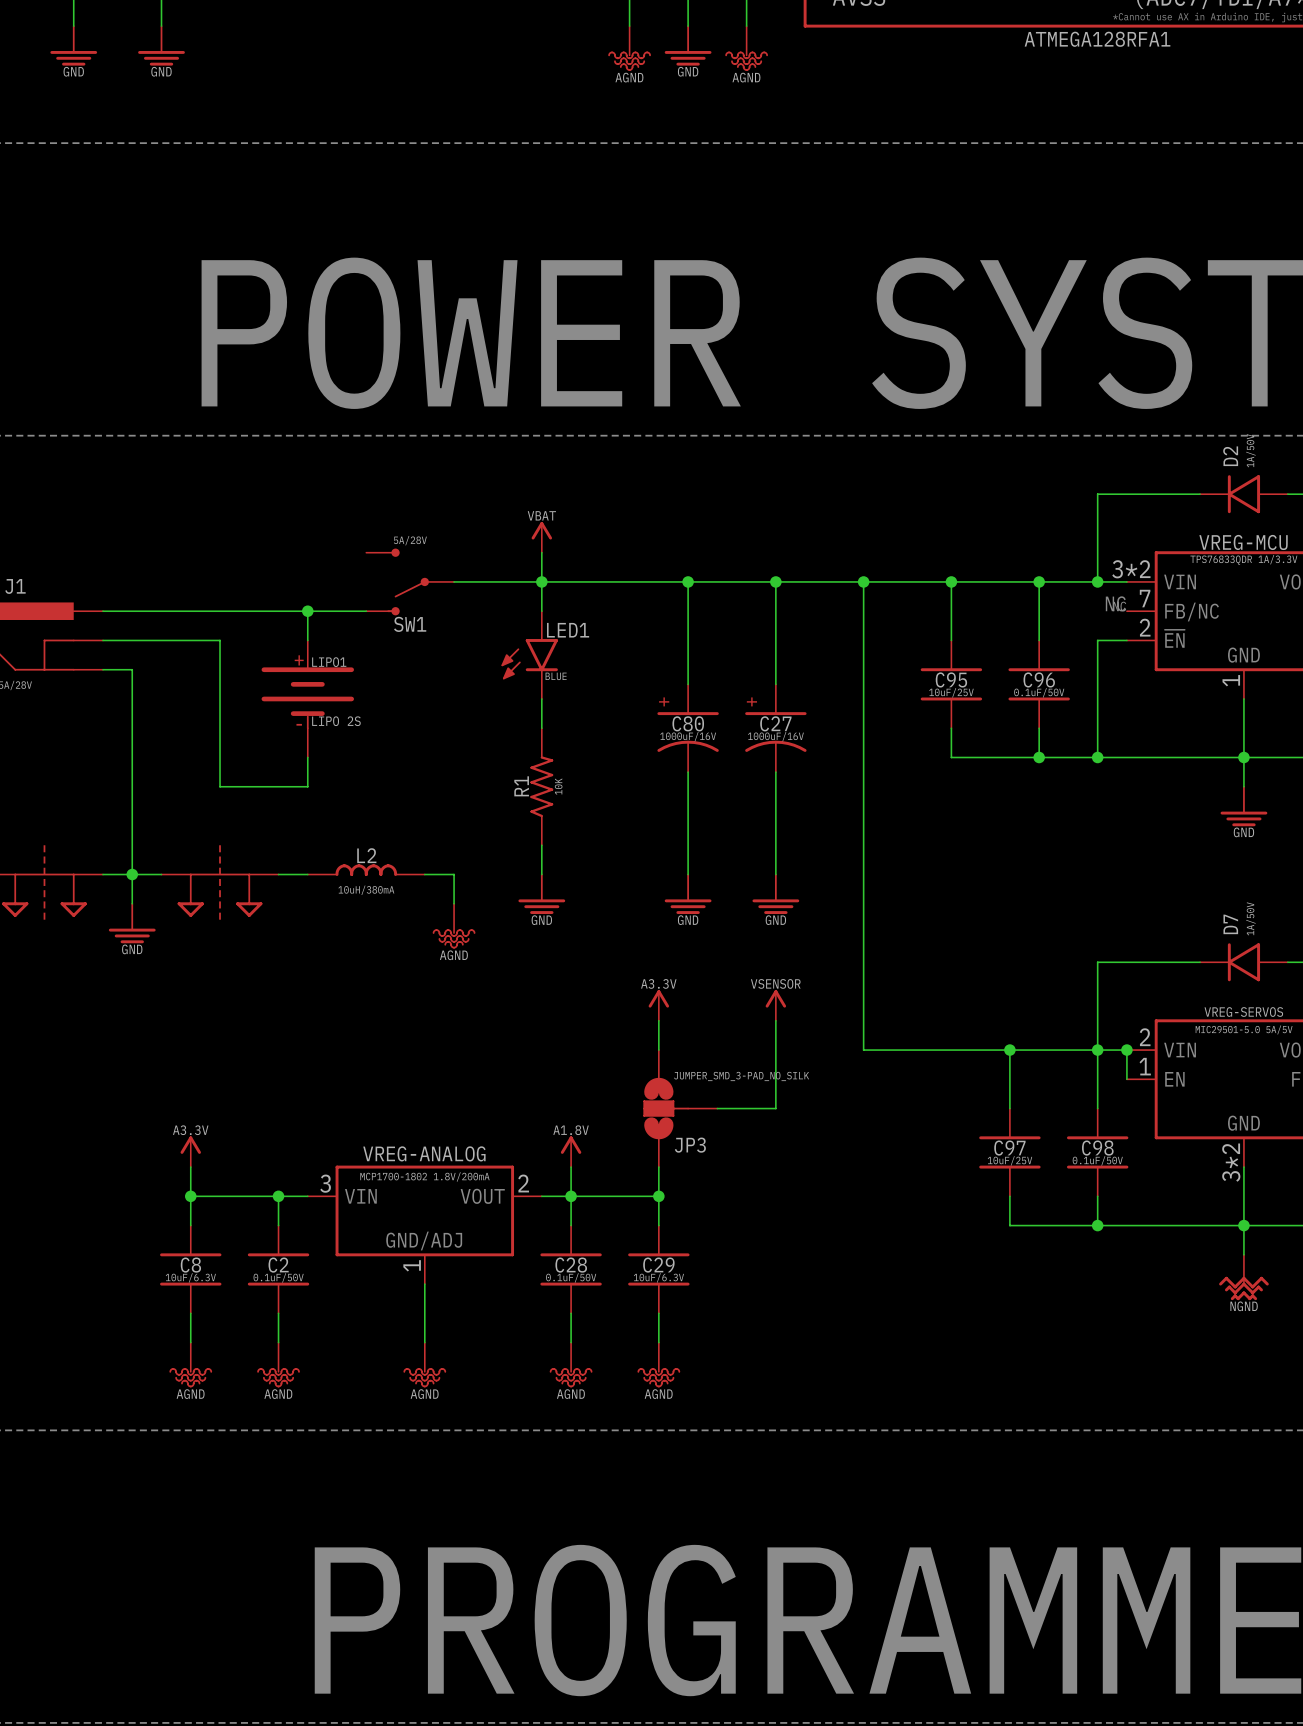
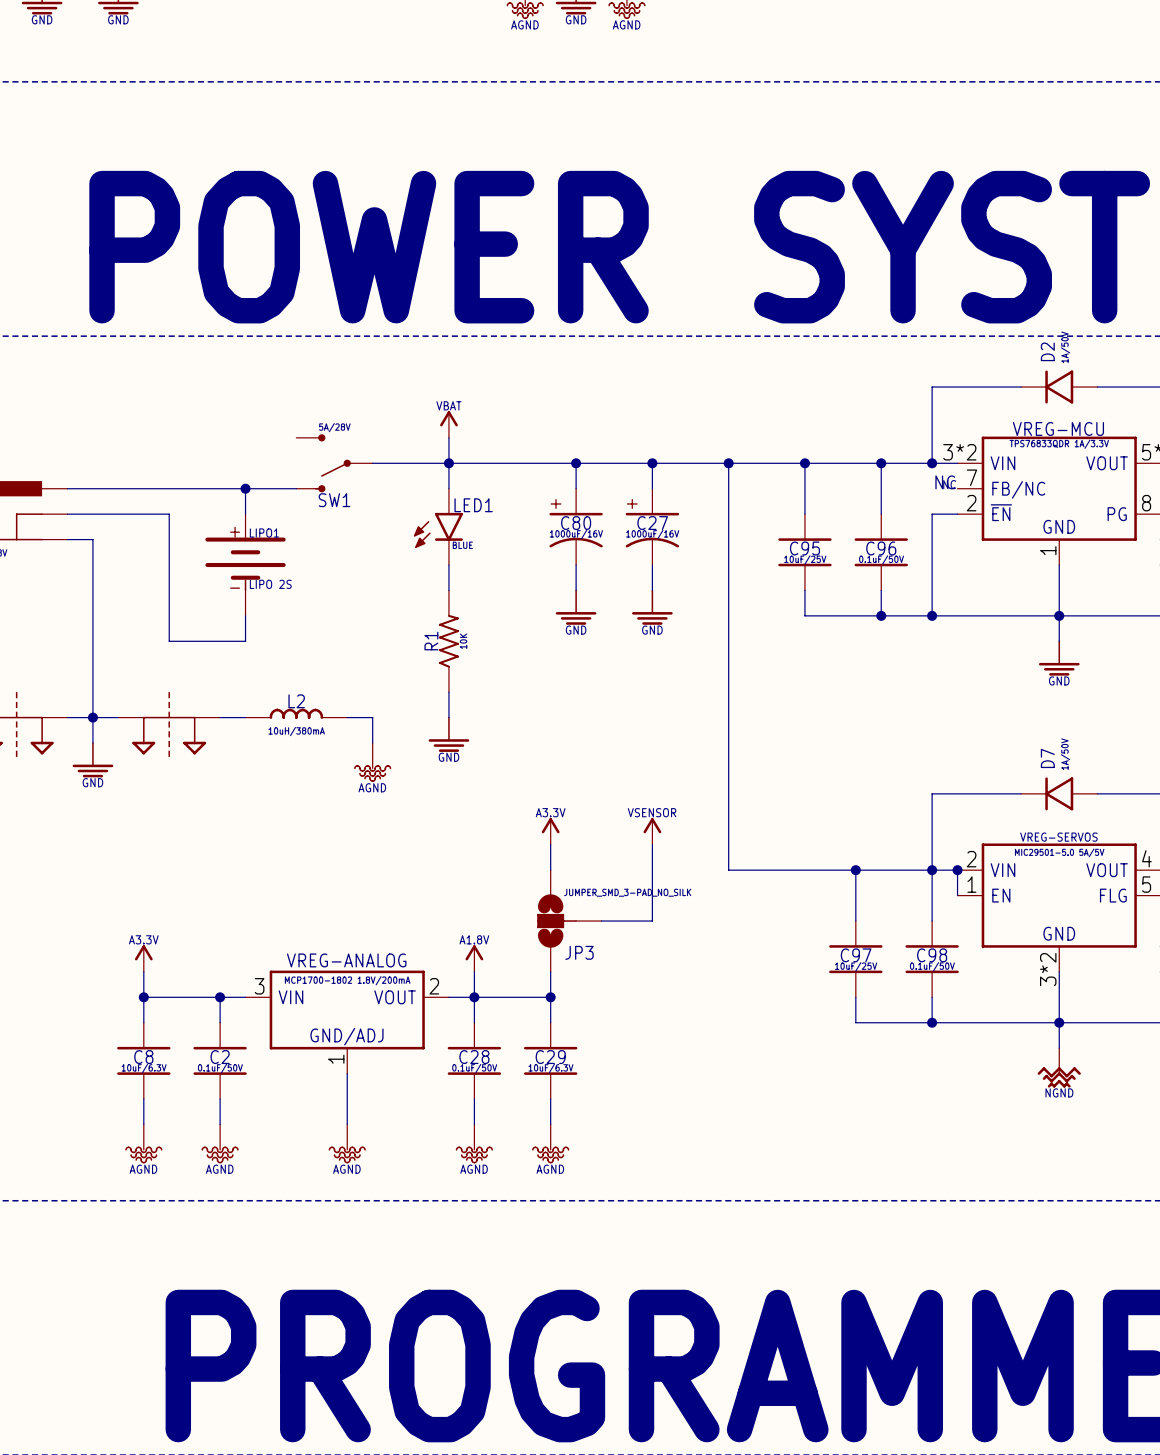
C80 position: (688, 728) -> (576, 526)
C27 position: (775, 728) -> (652, 526)
power symbol: none -> (576, 607)
power symbol: none -> (652, 607)
wire: (688, 772) (688, 874) -> none
wire: (775, 772) (775, 874) -> none
power symbol: (688, 893) -> none
power symbol: (775, 893) -> none

